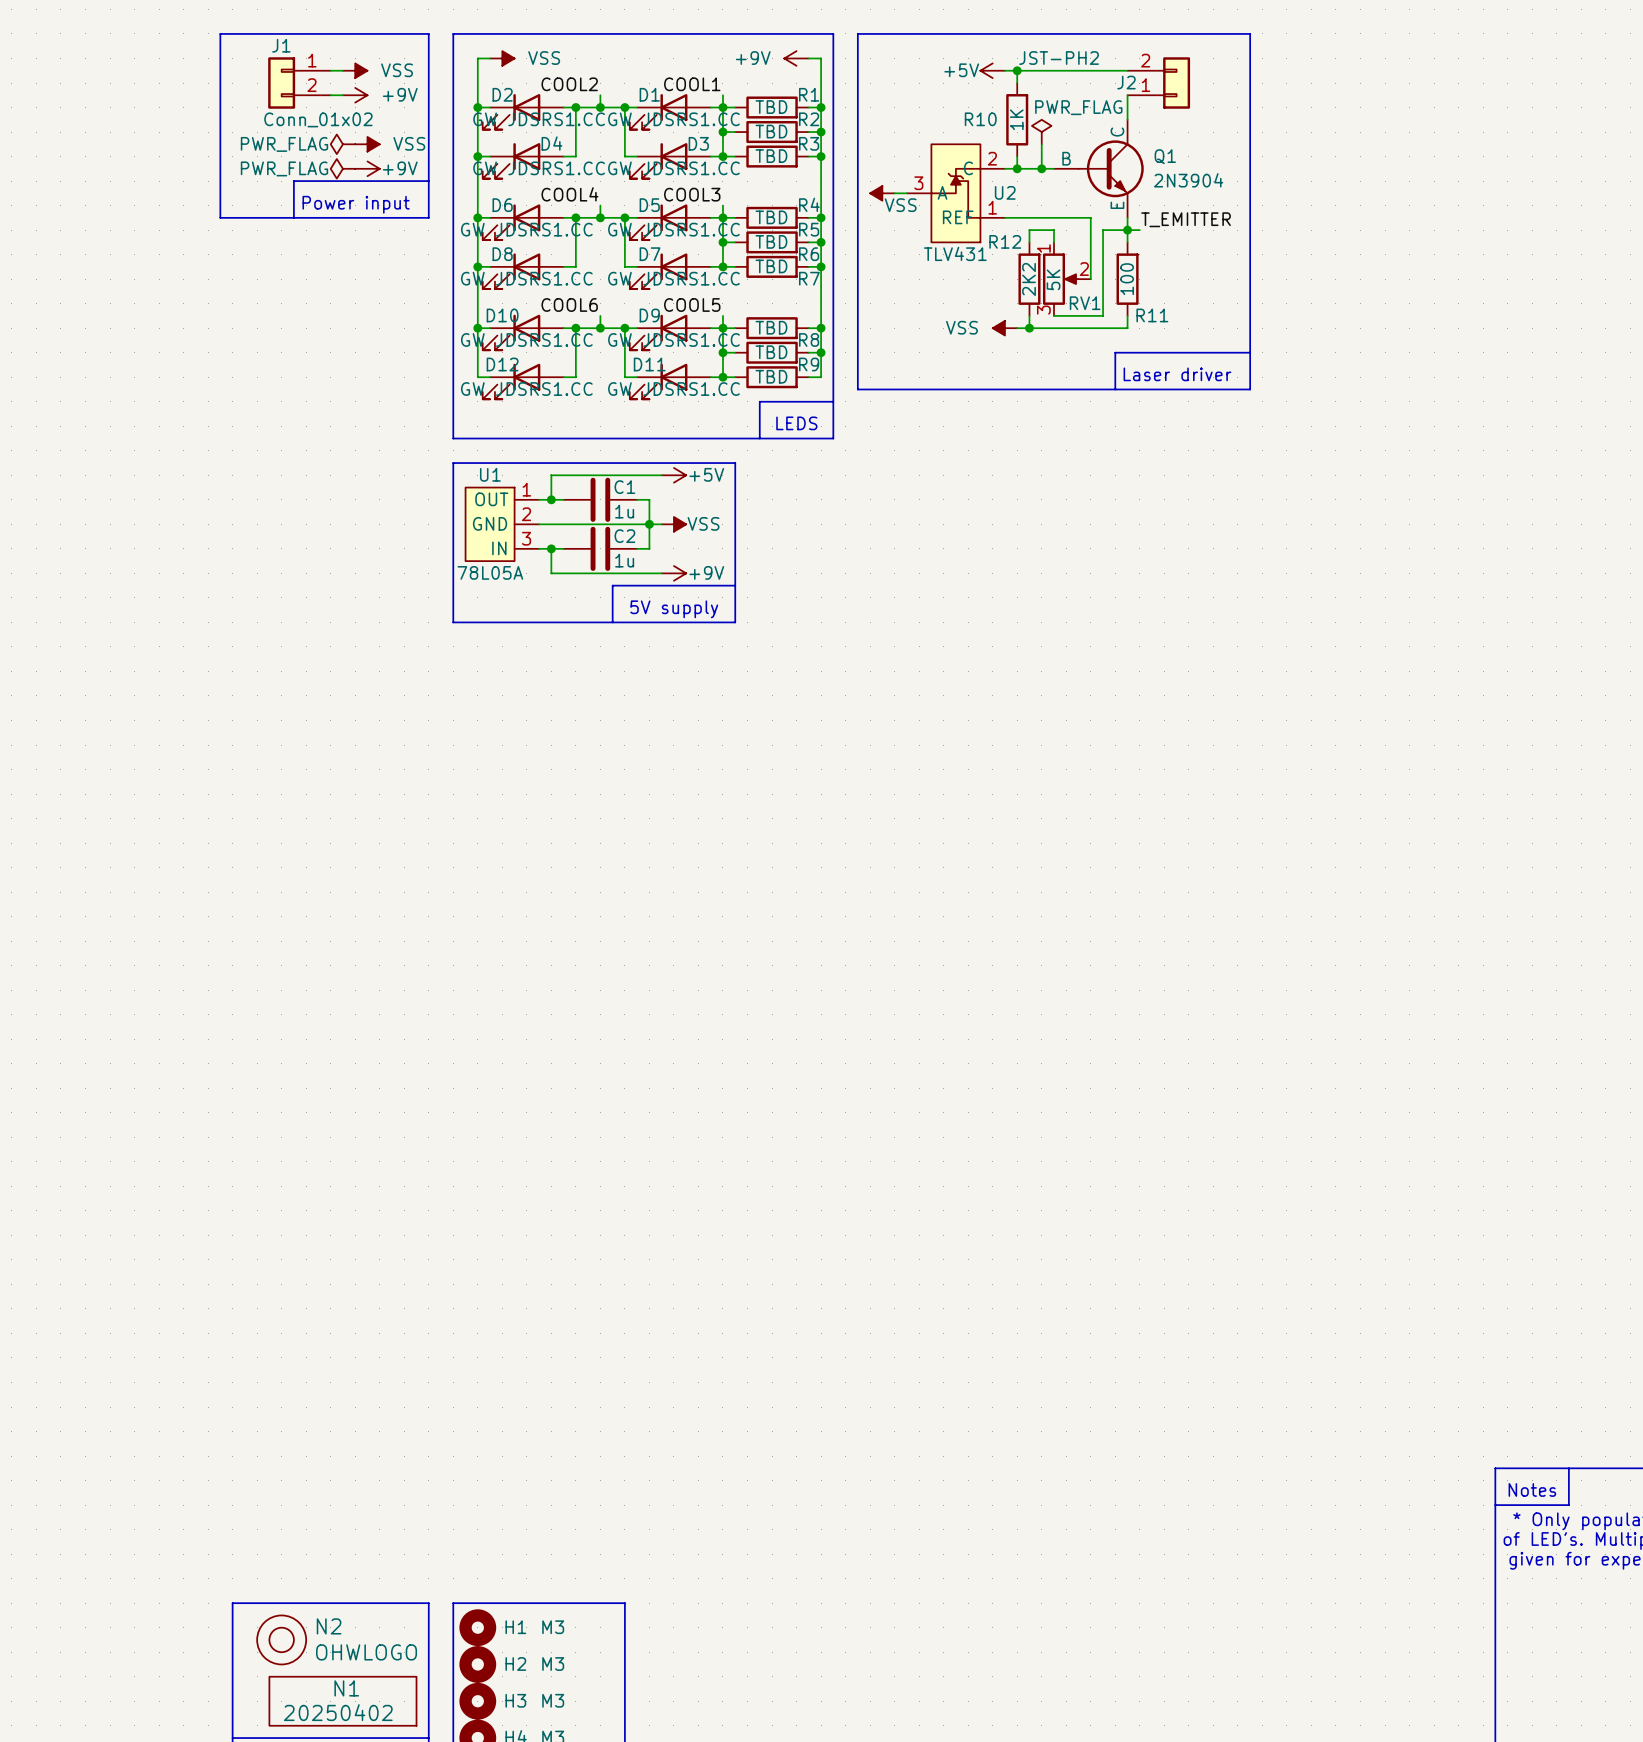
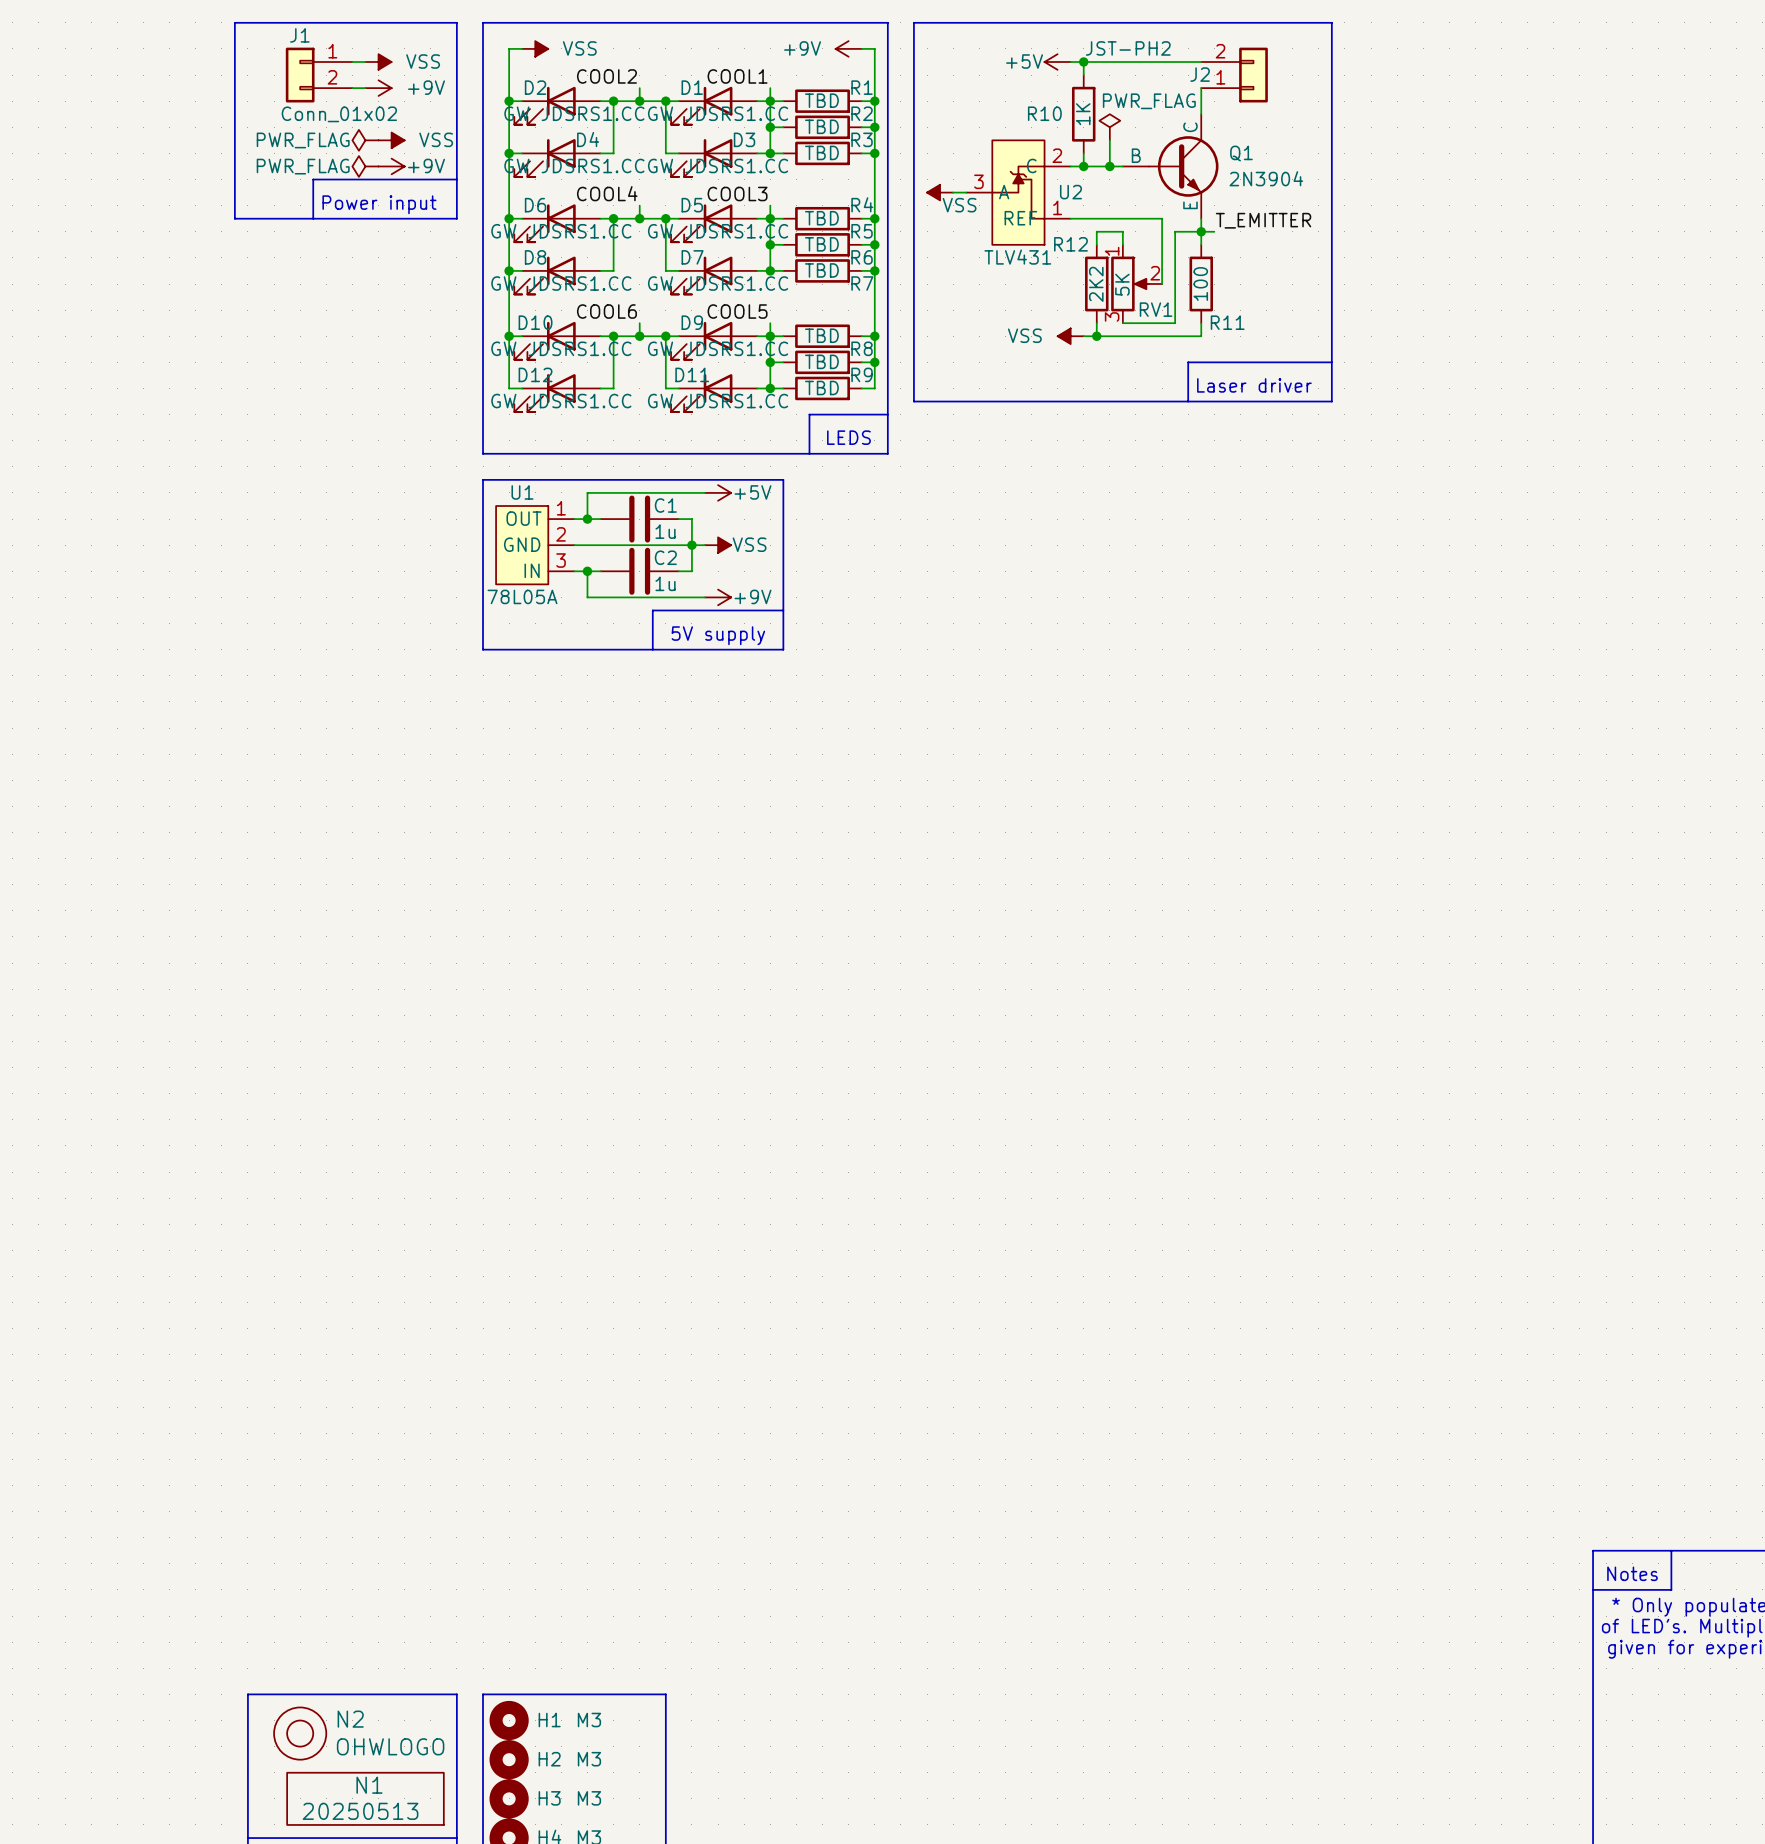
N1 value: 20250402 (338, 1712) -> 20250513 (360, 1811)

